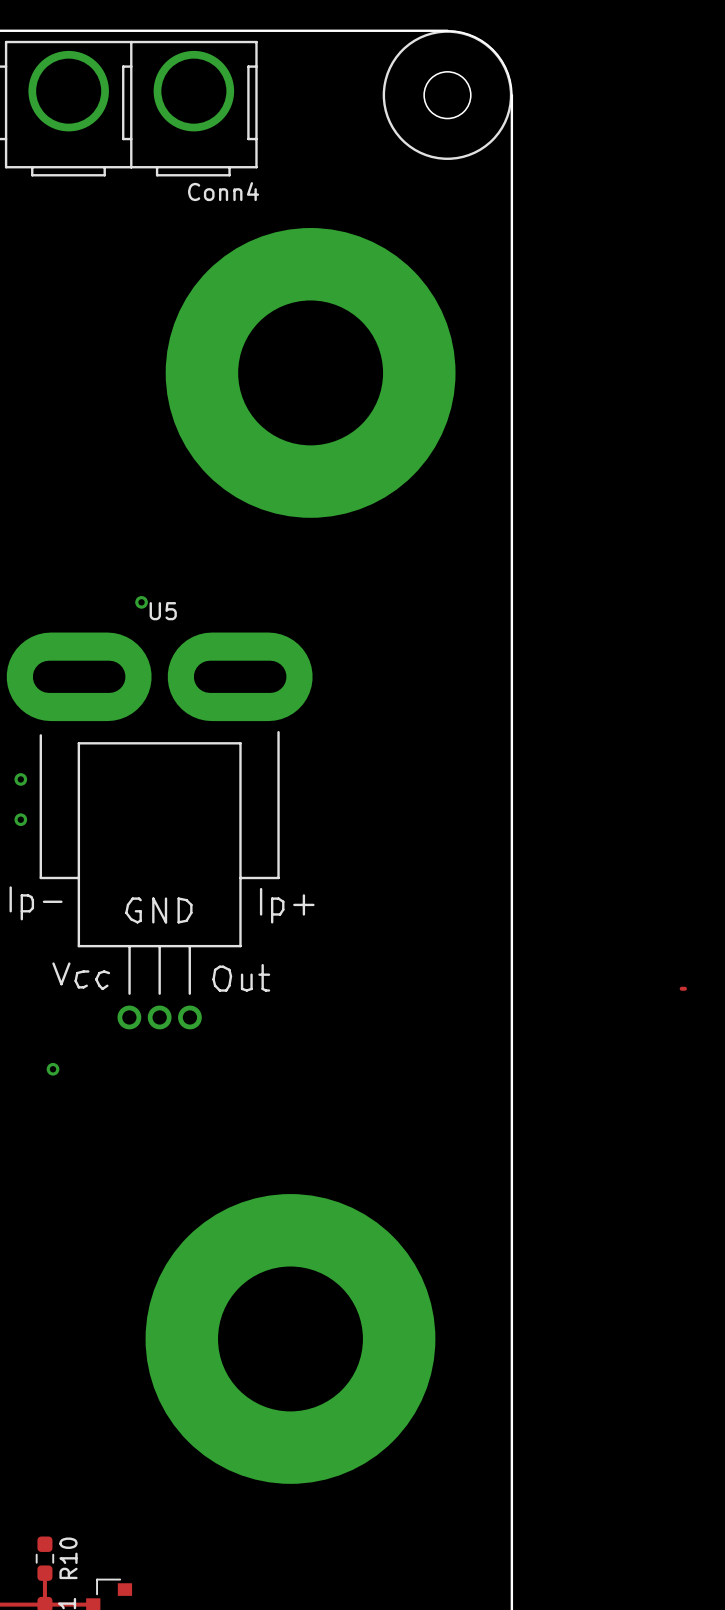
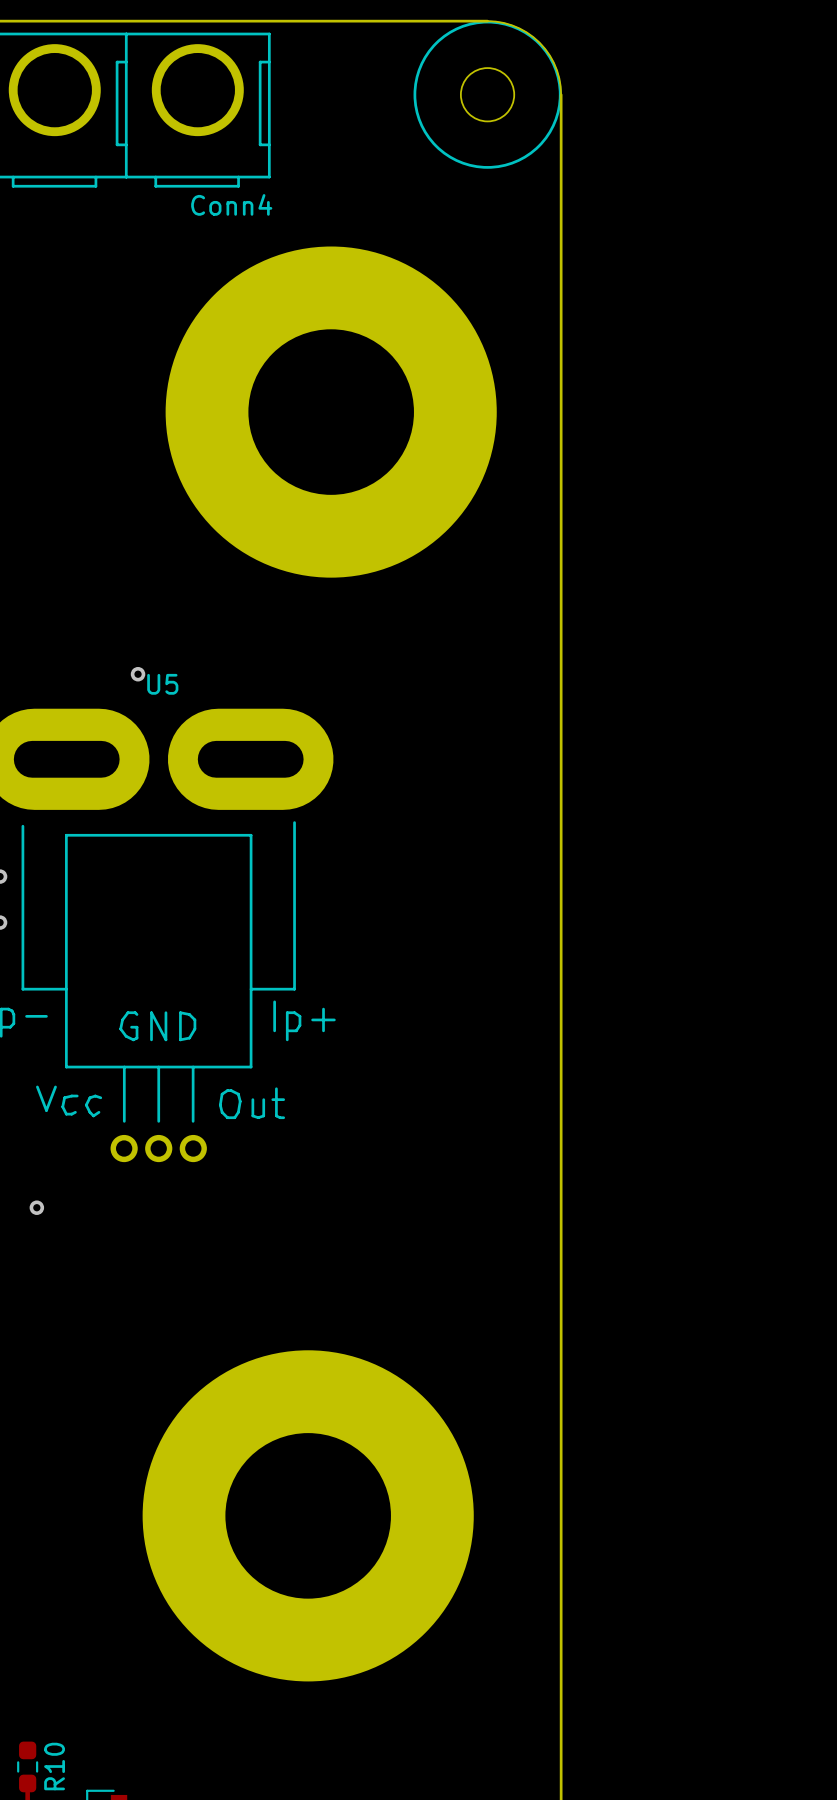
track: (681, 988) (684, 988) -> none

